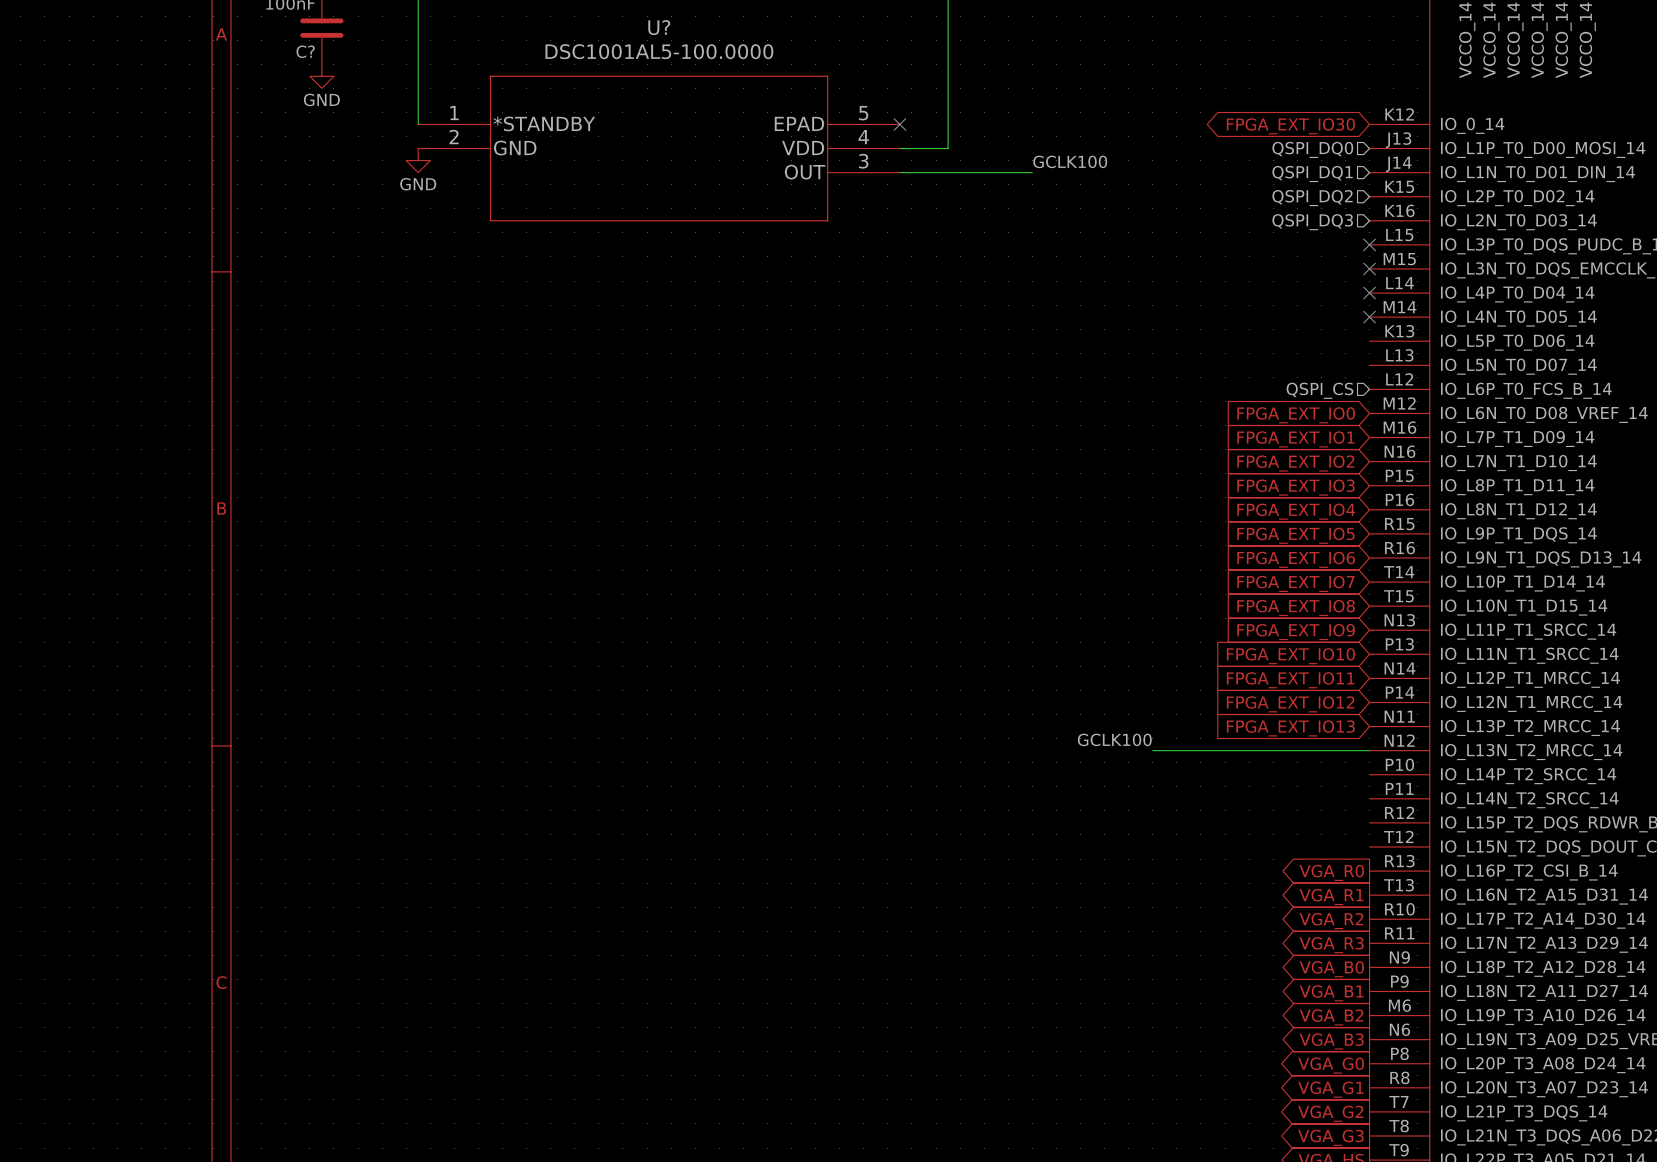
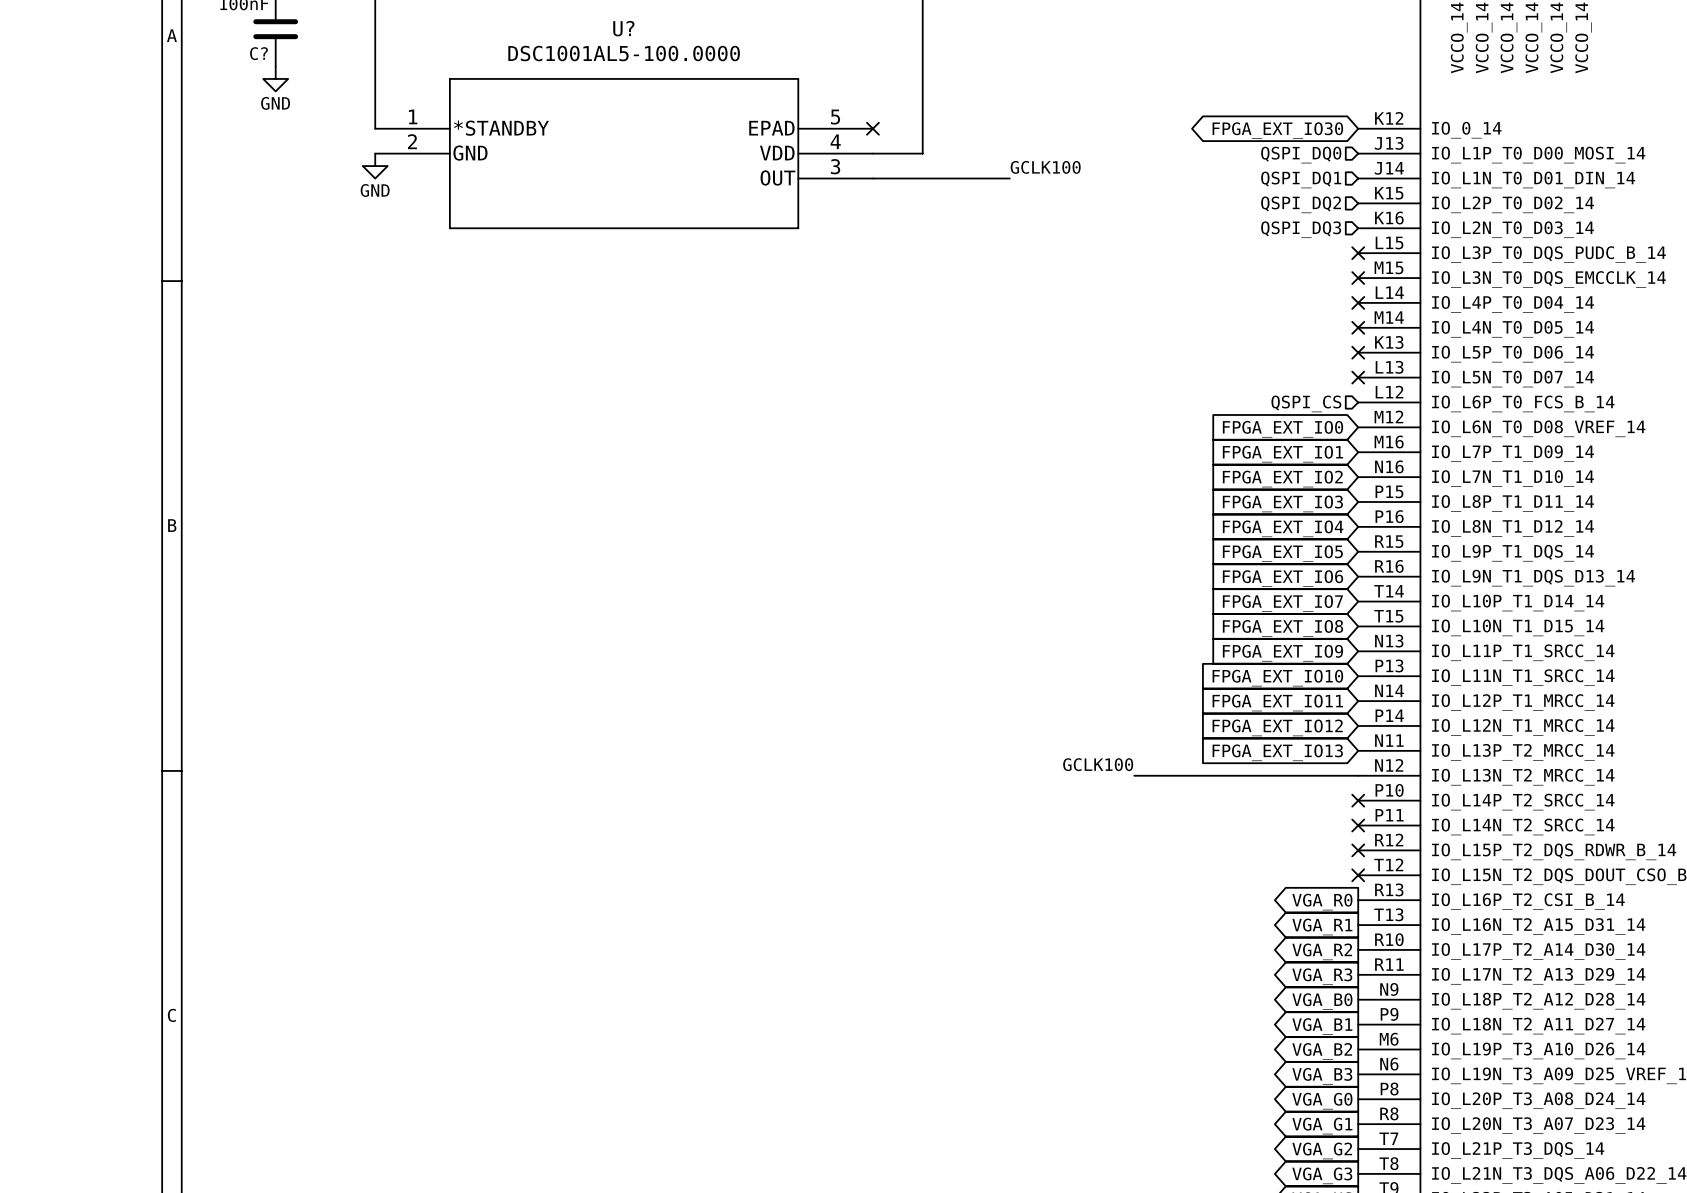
no-connect mark: none -> (1358, 352)
no-connect mark: none -> (1358, 377)
no-connect mark: none -> (1358, 800)
no-connect mark: none -> (1358, 825)
no-connect mark: none -> (1358, 850)
no-connect mark: none -> (1358, 875)

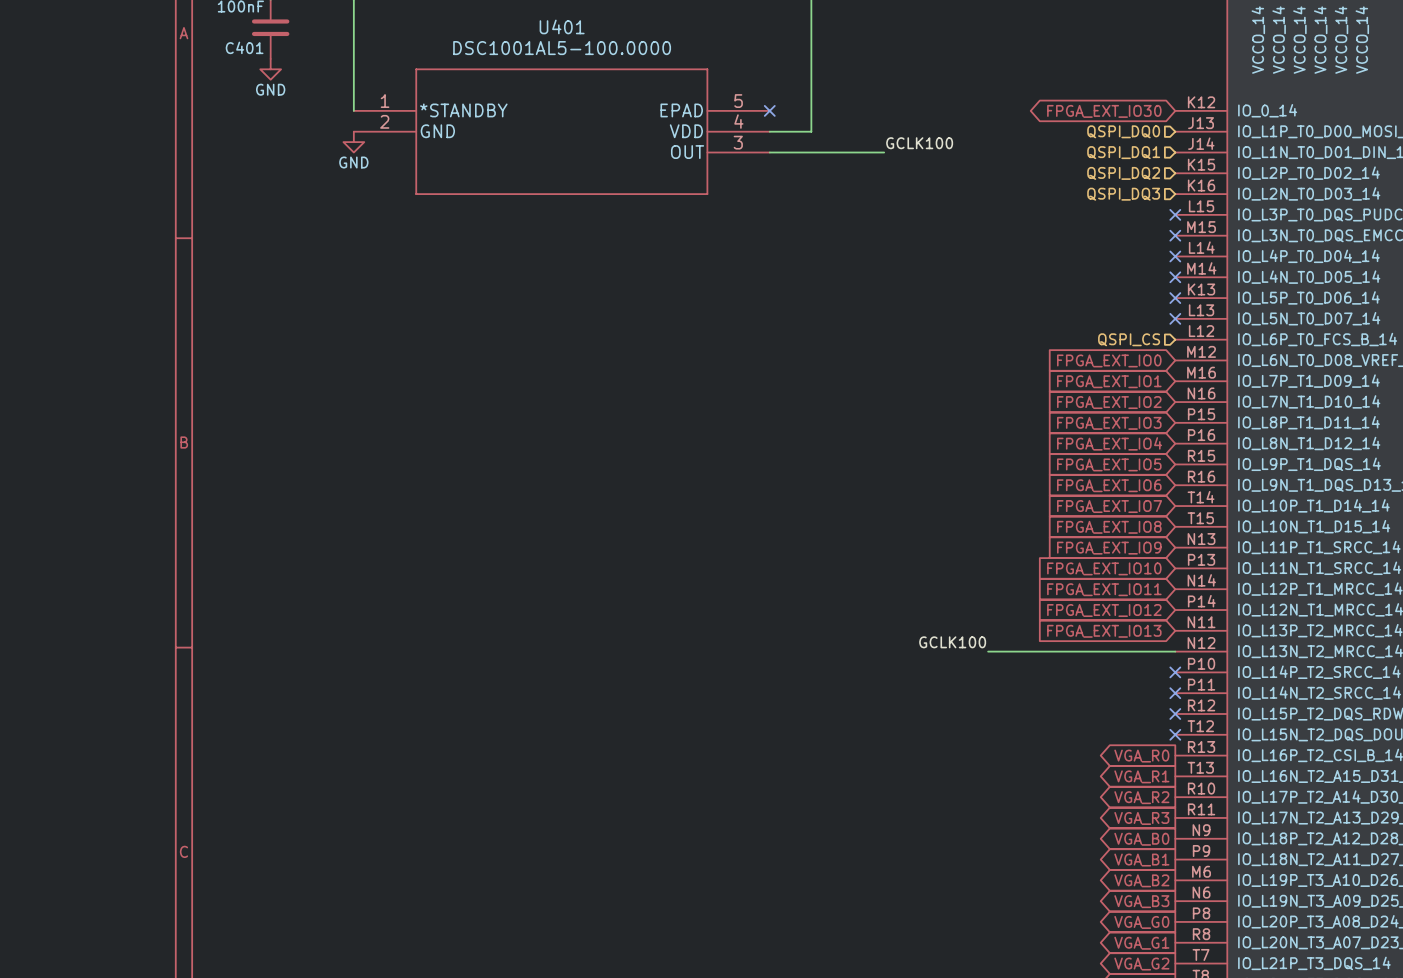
U? name: U? (623, 28) -> U401 (562, 26)
C? name: C? (258, 53) -> C401 (244, 47)

